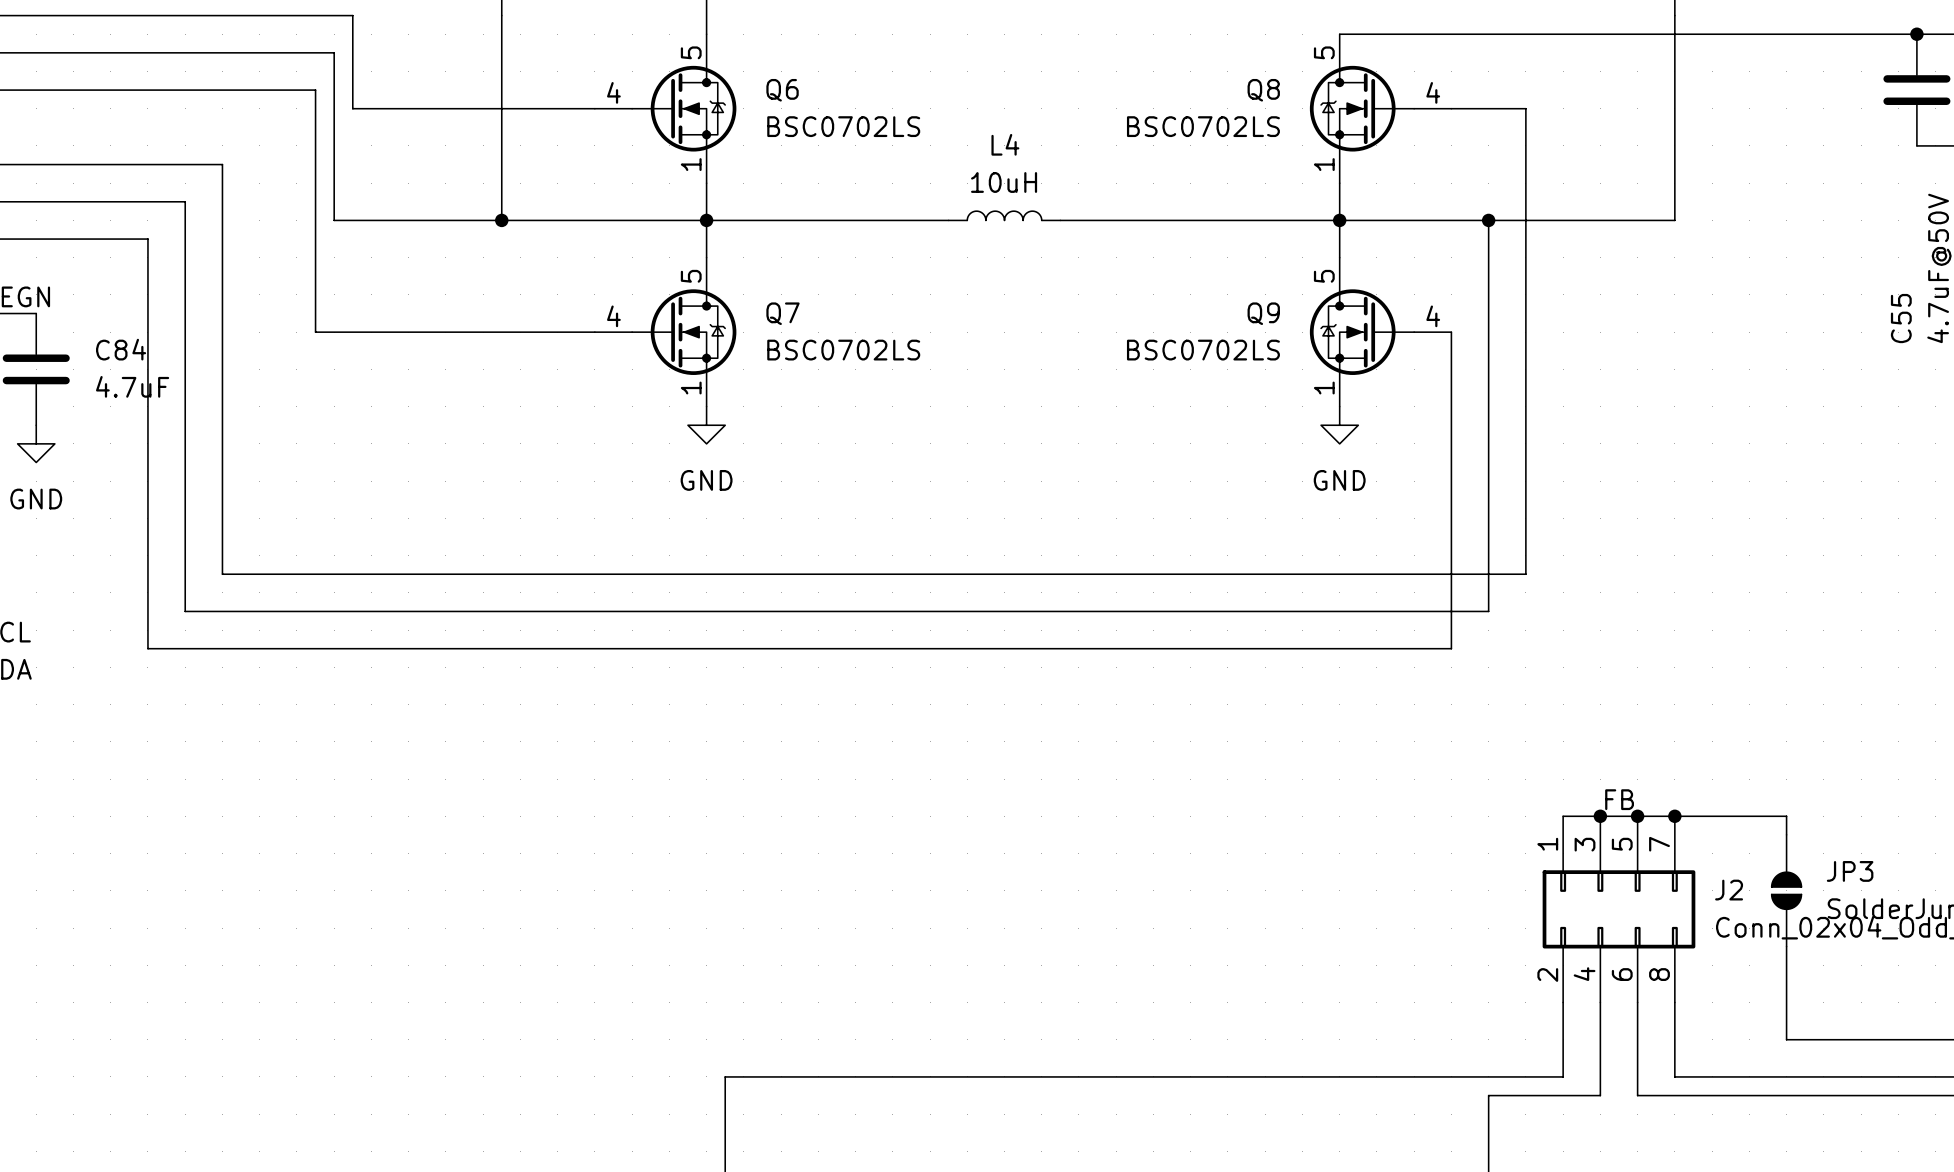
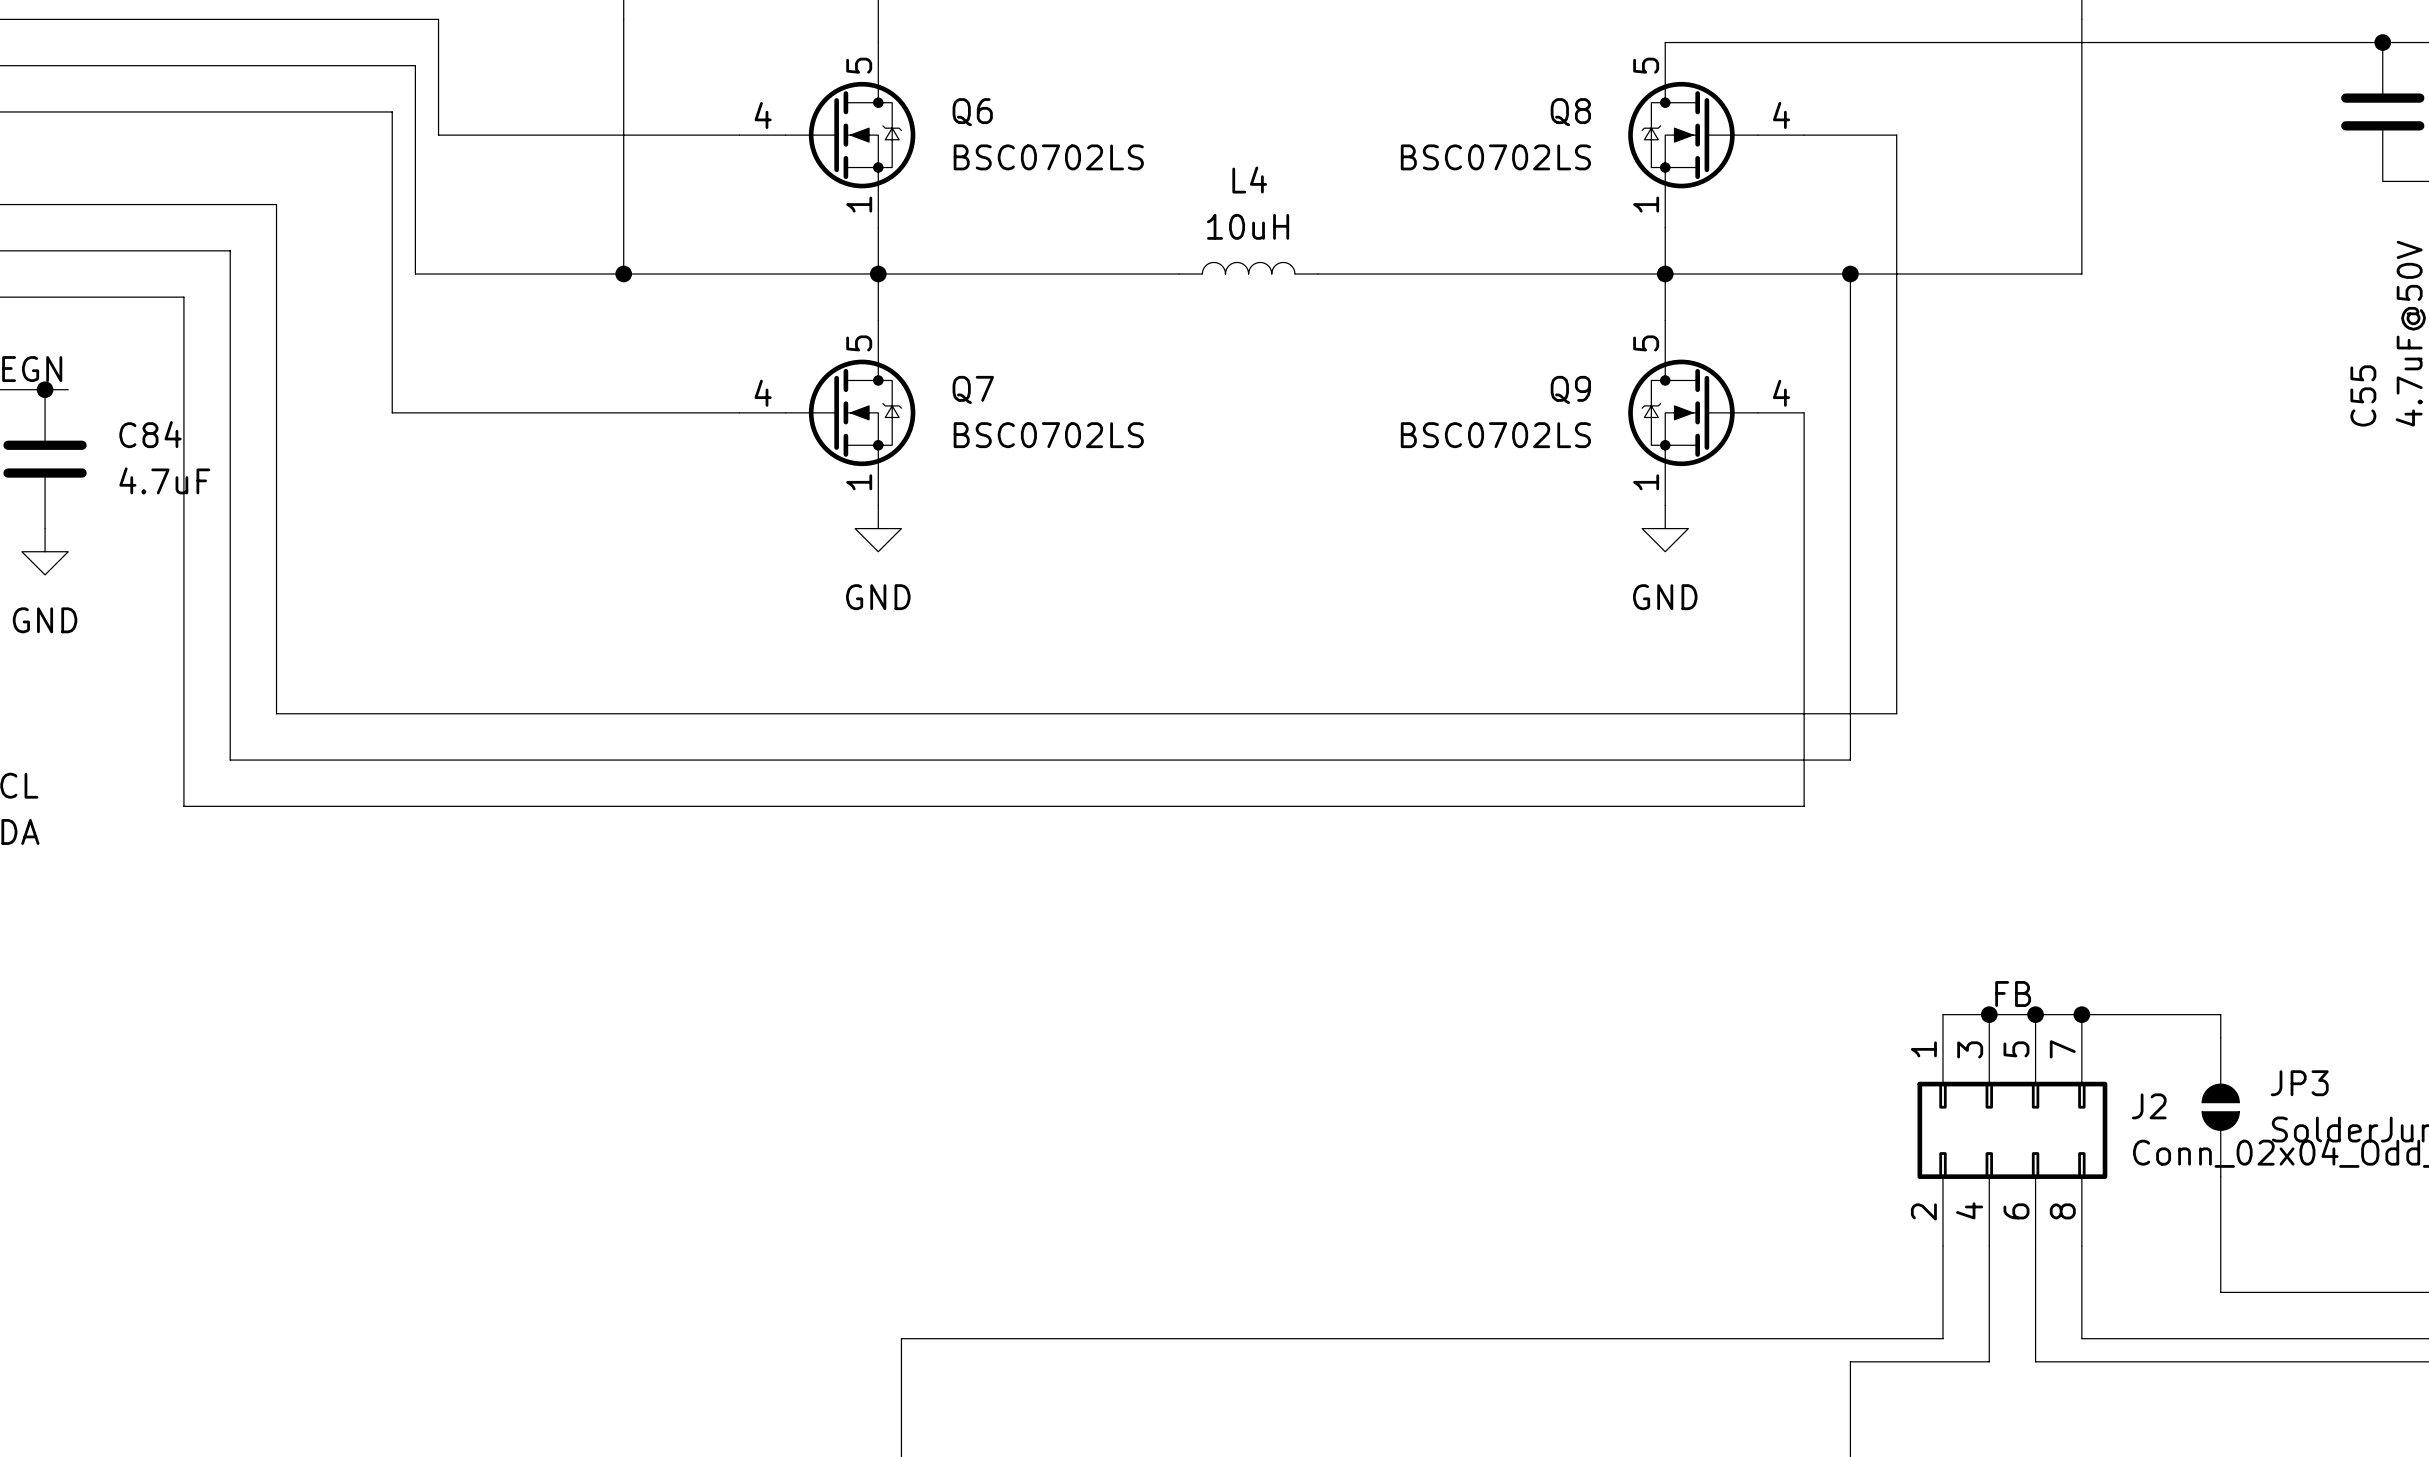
wire: none -> (45, 389) (68, 389)
junction: none -> (45, 389)

